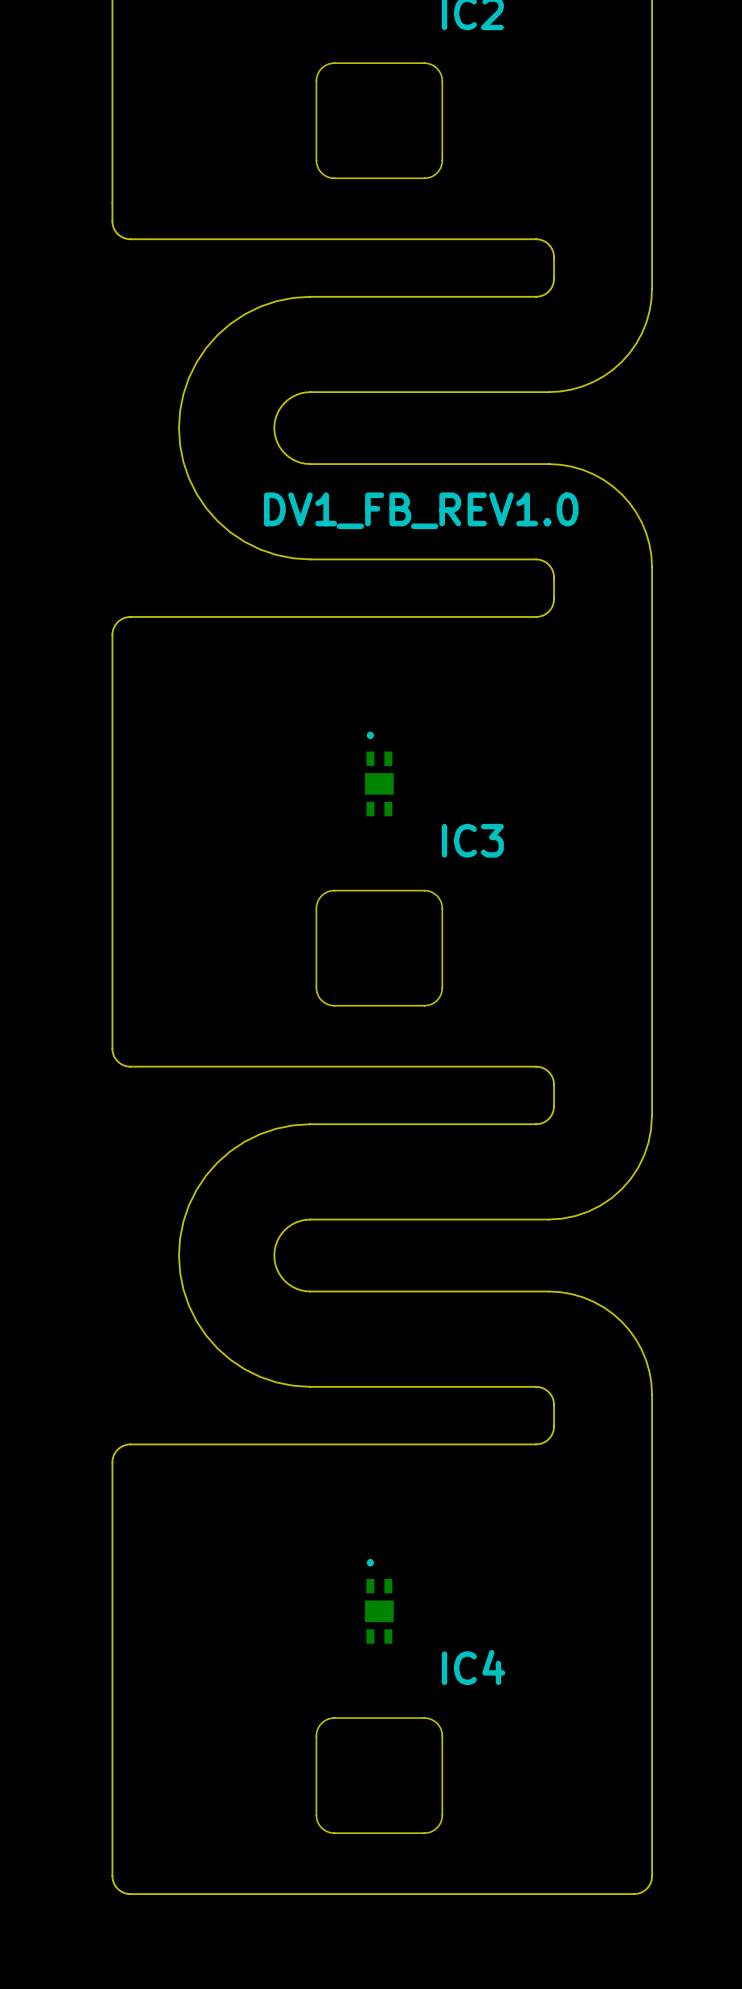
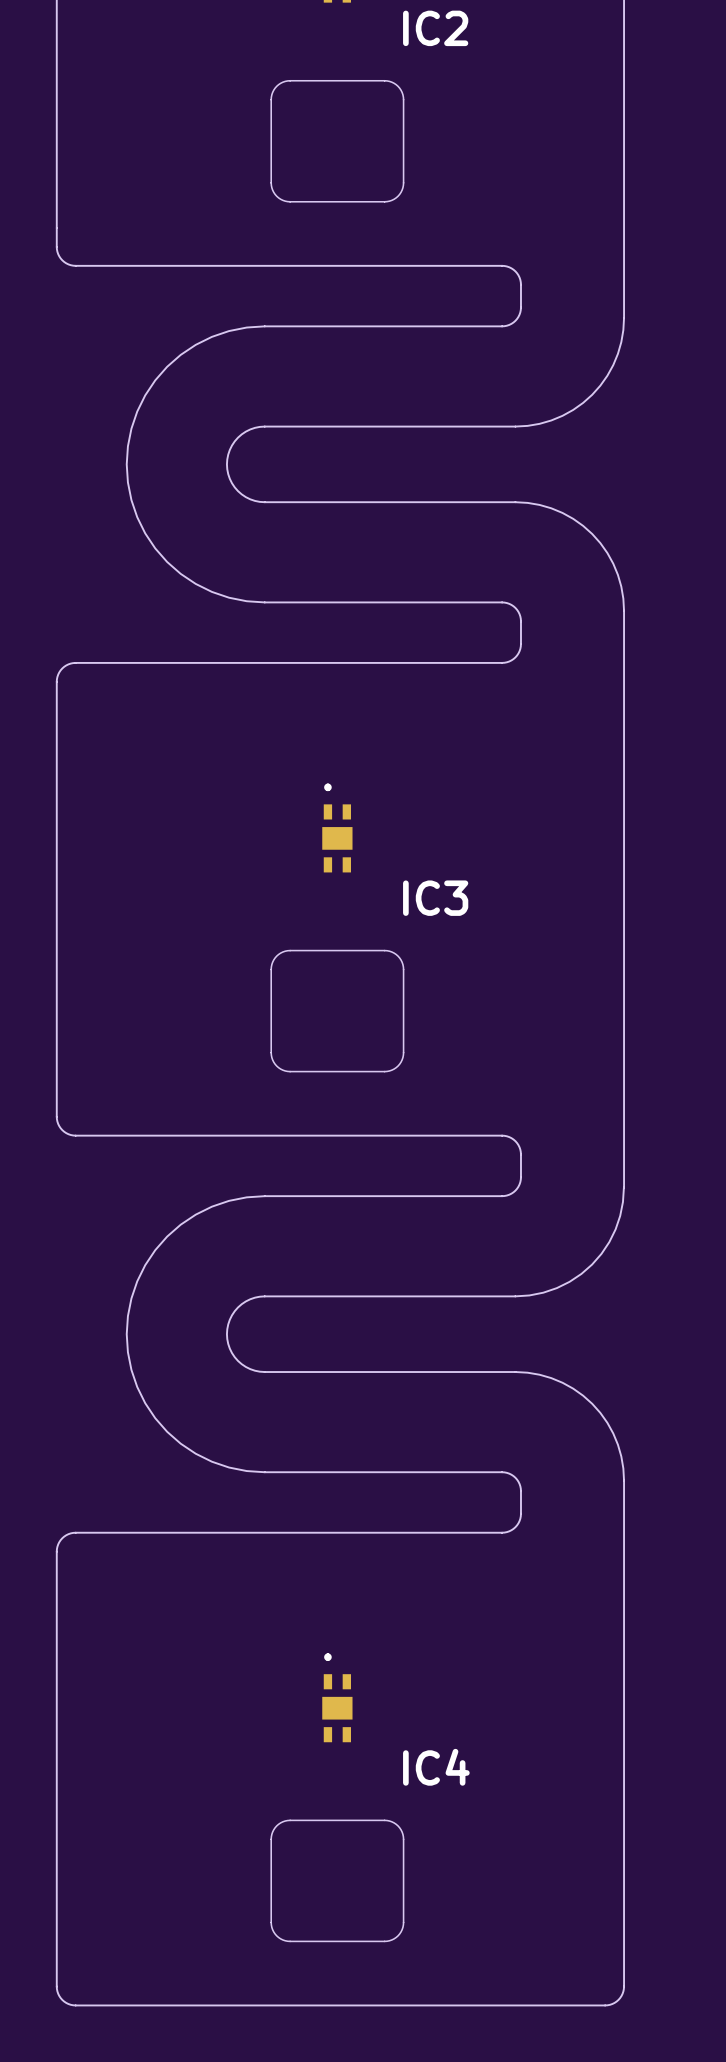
text: DV1_FB_REV1.0 (421, 510) -> none

